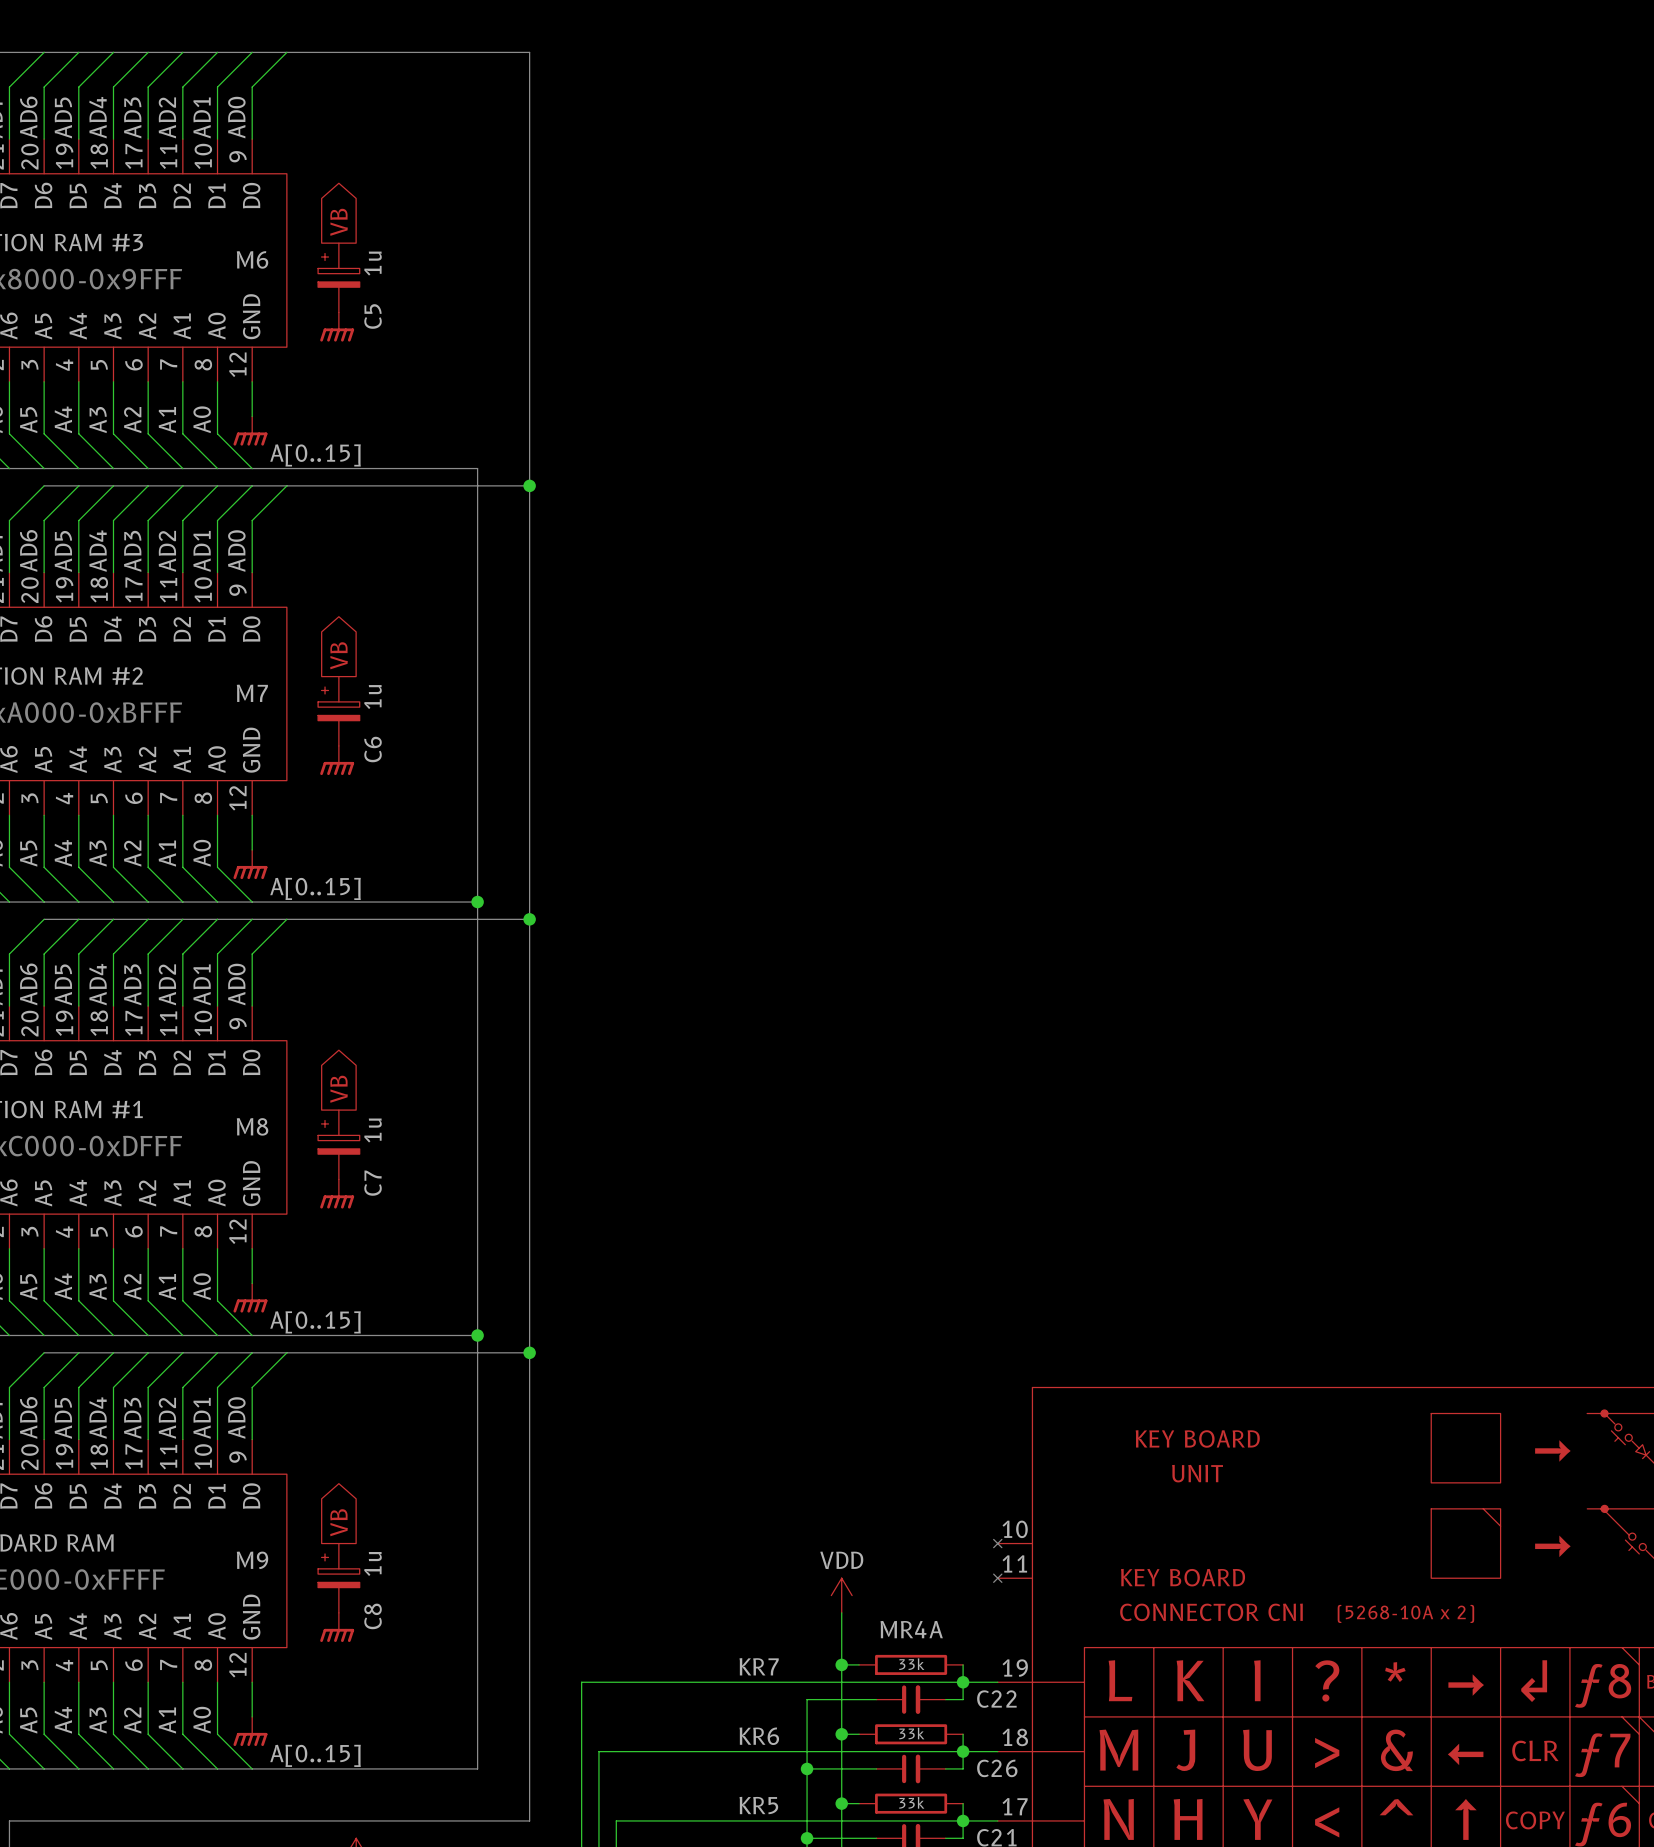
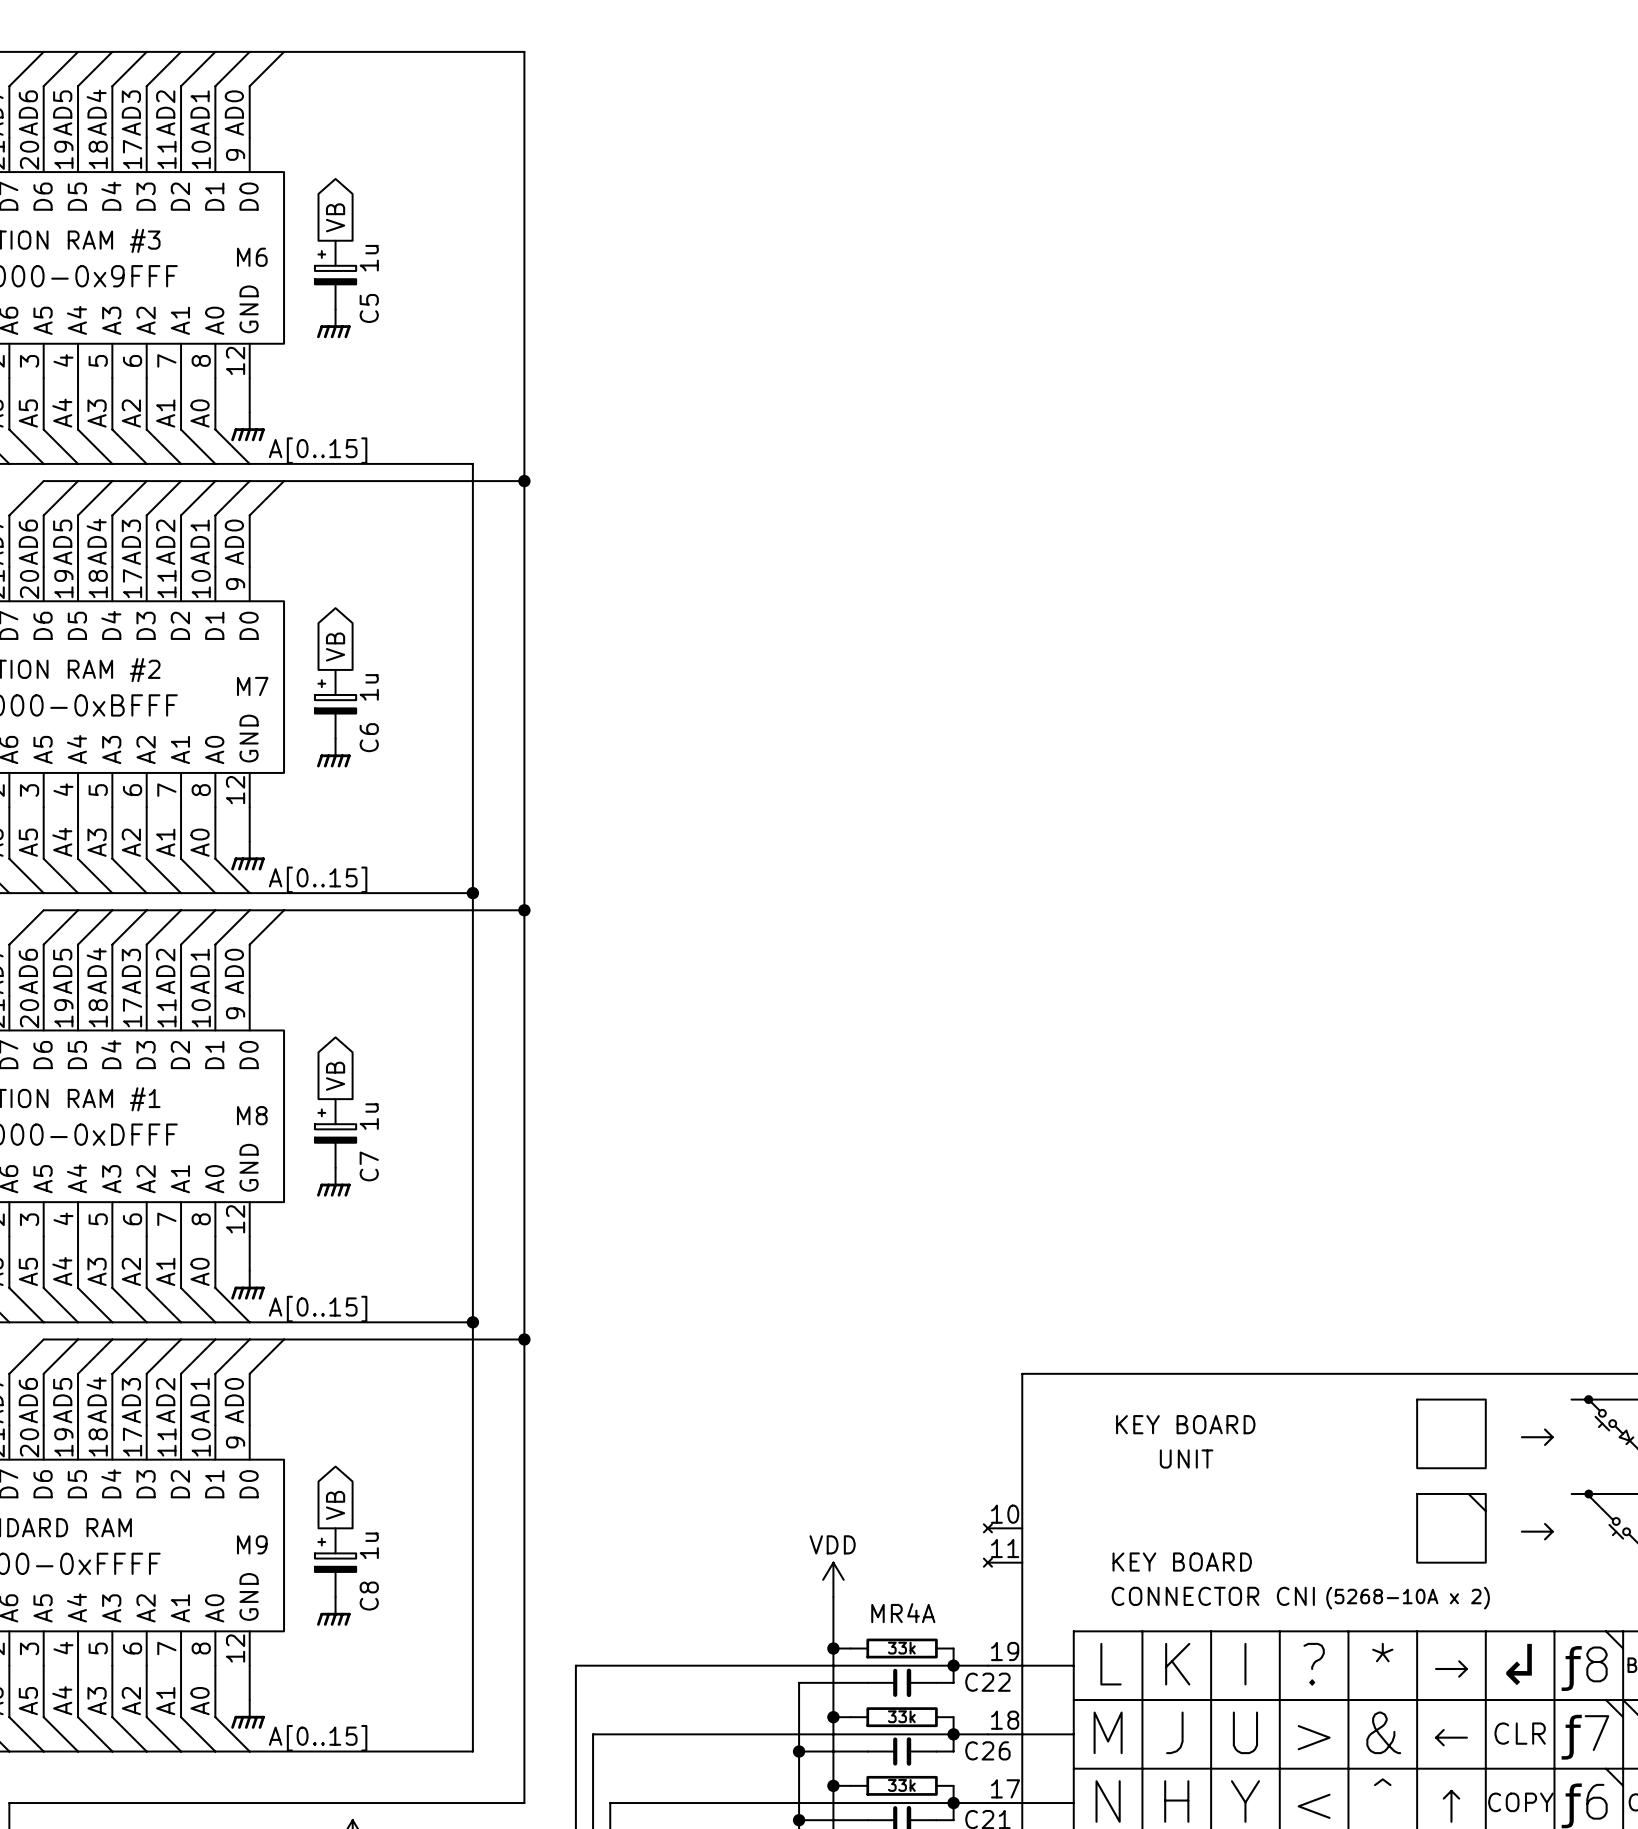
label: KR7 (759, 1666) -> none
label: KR6 (759, 1736) -> none
label: KR5 (758, 1805) -> none

